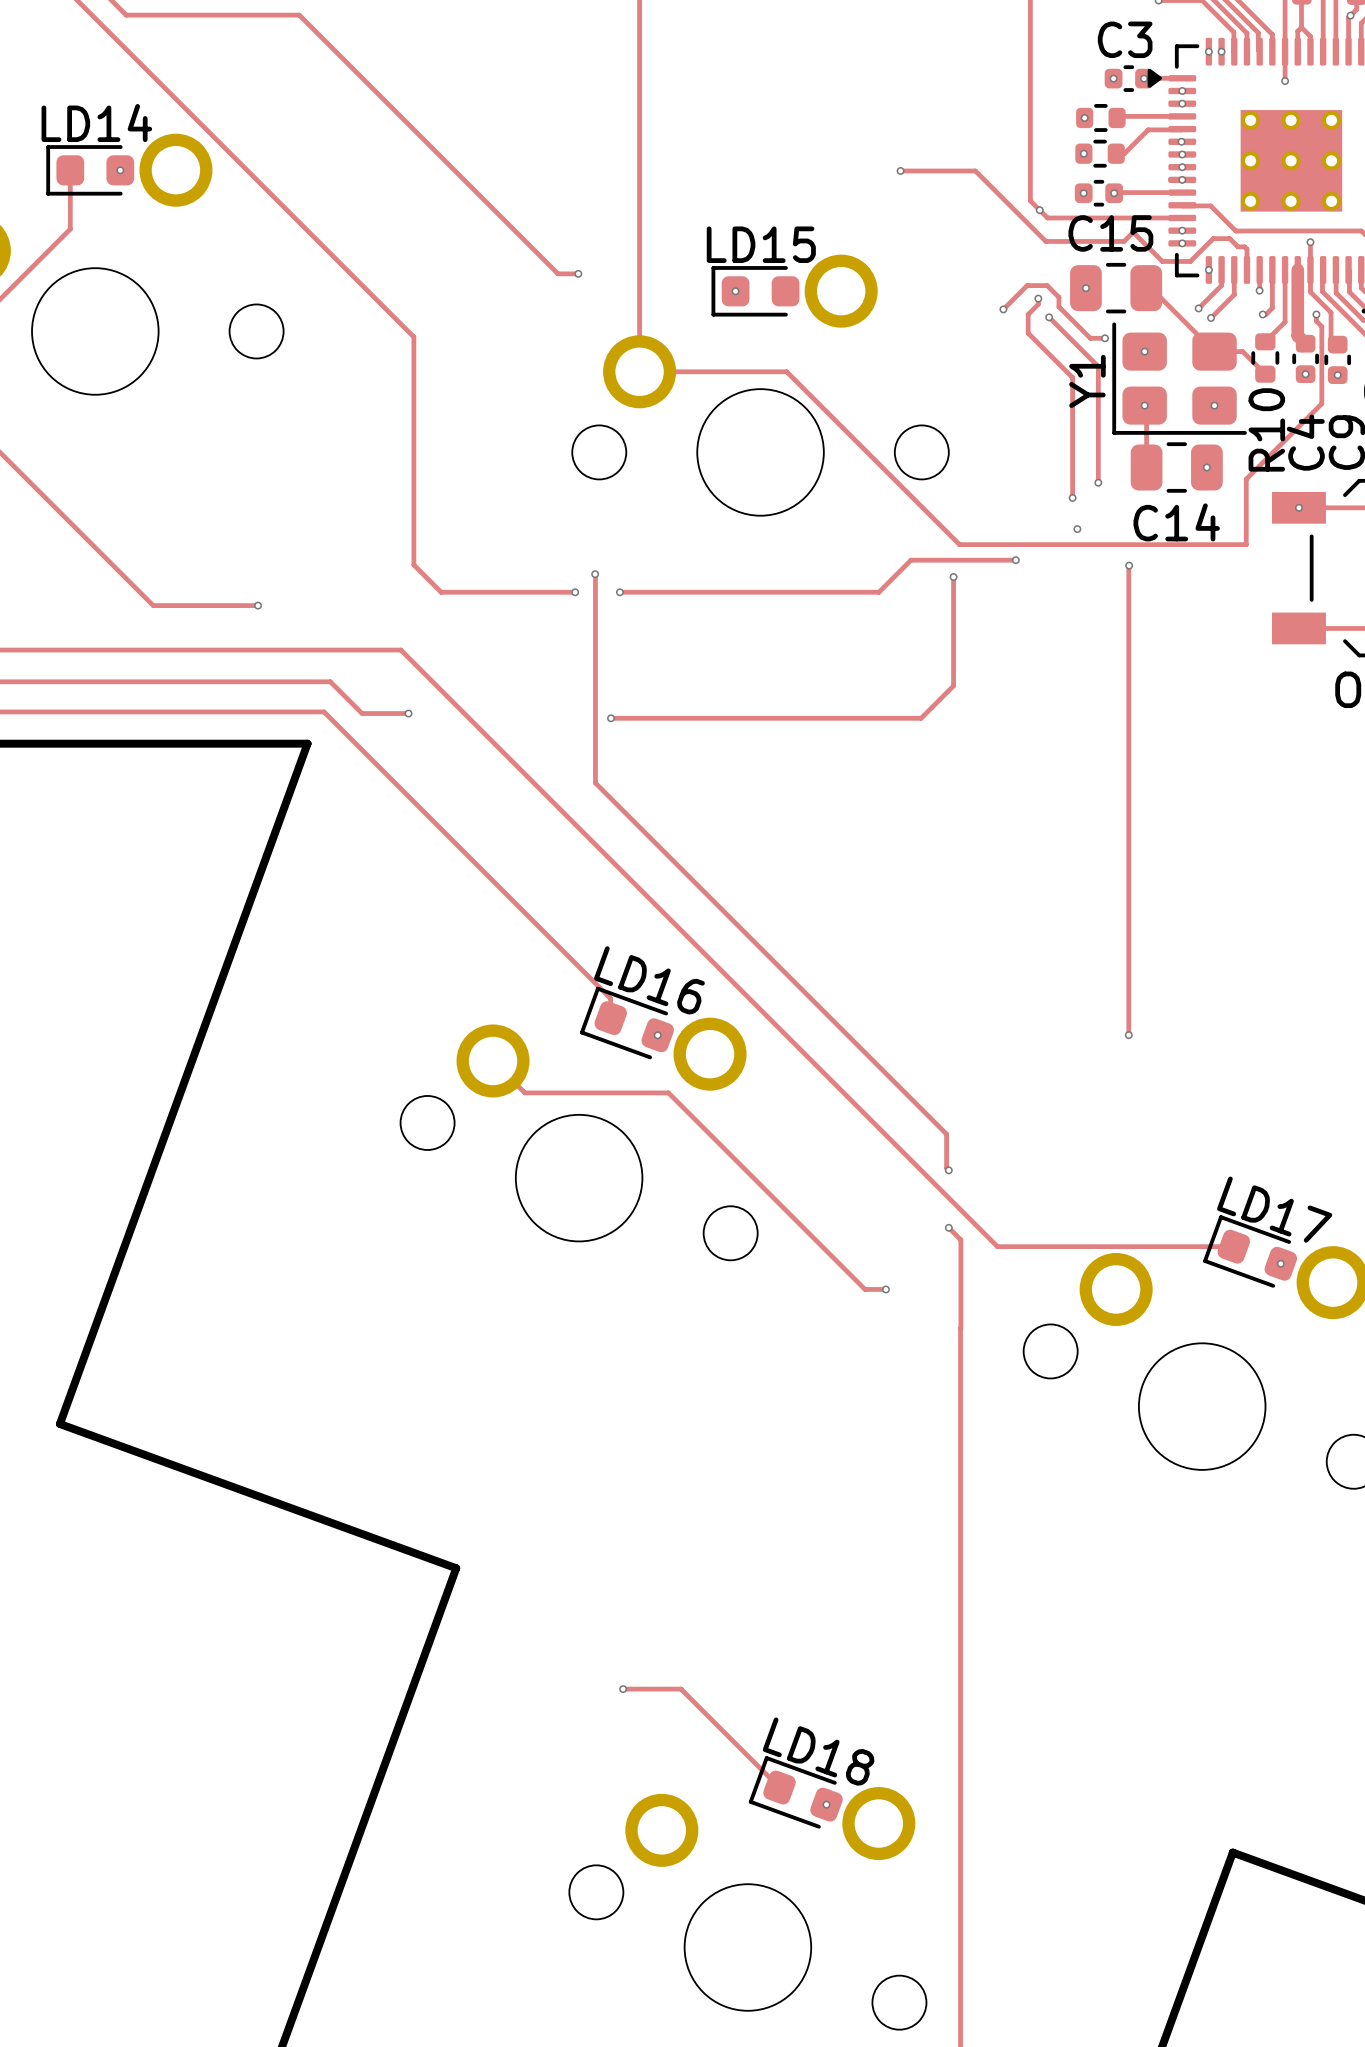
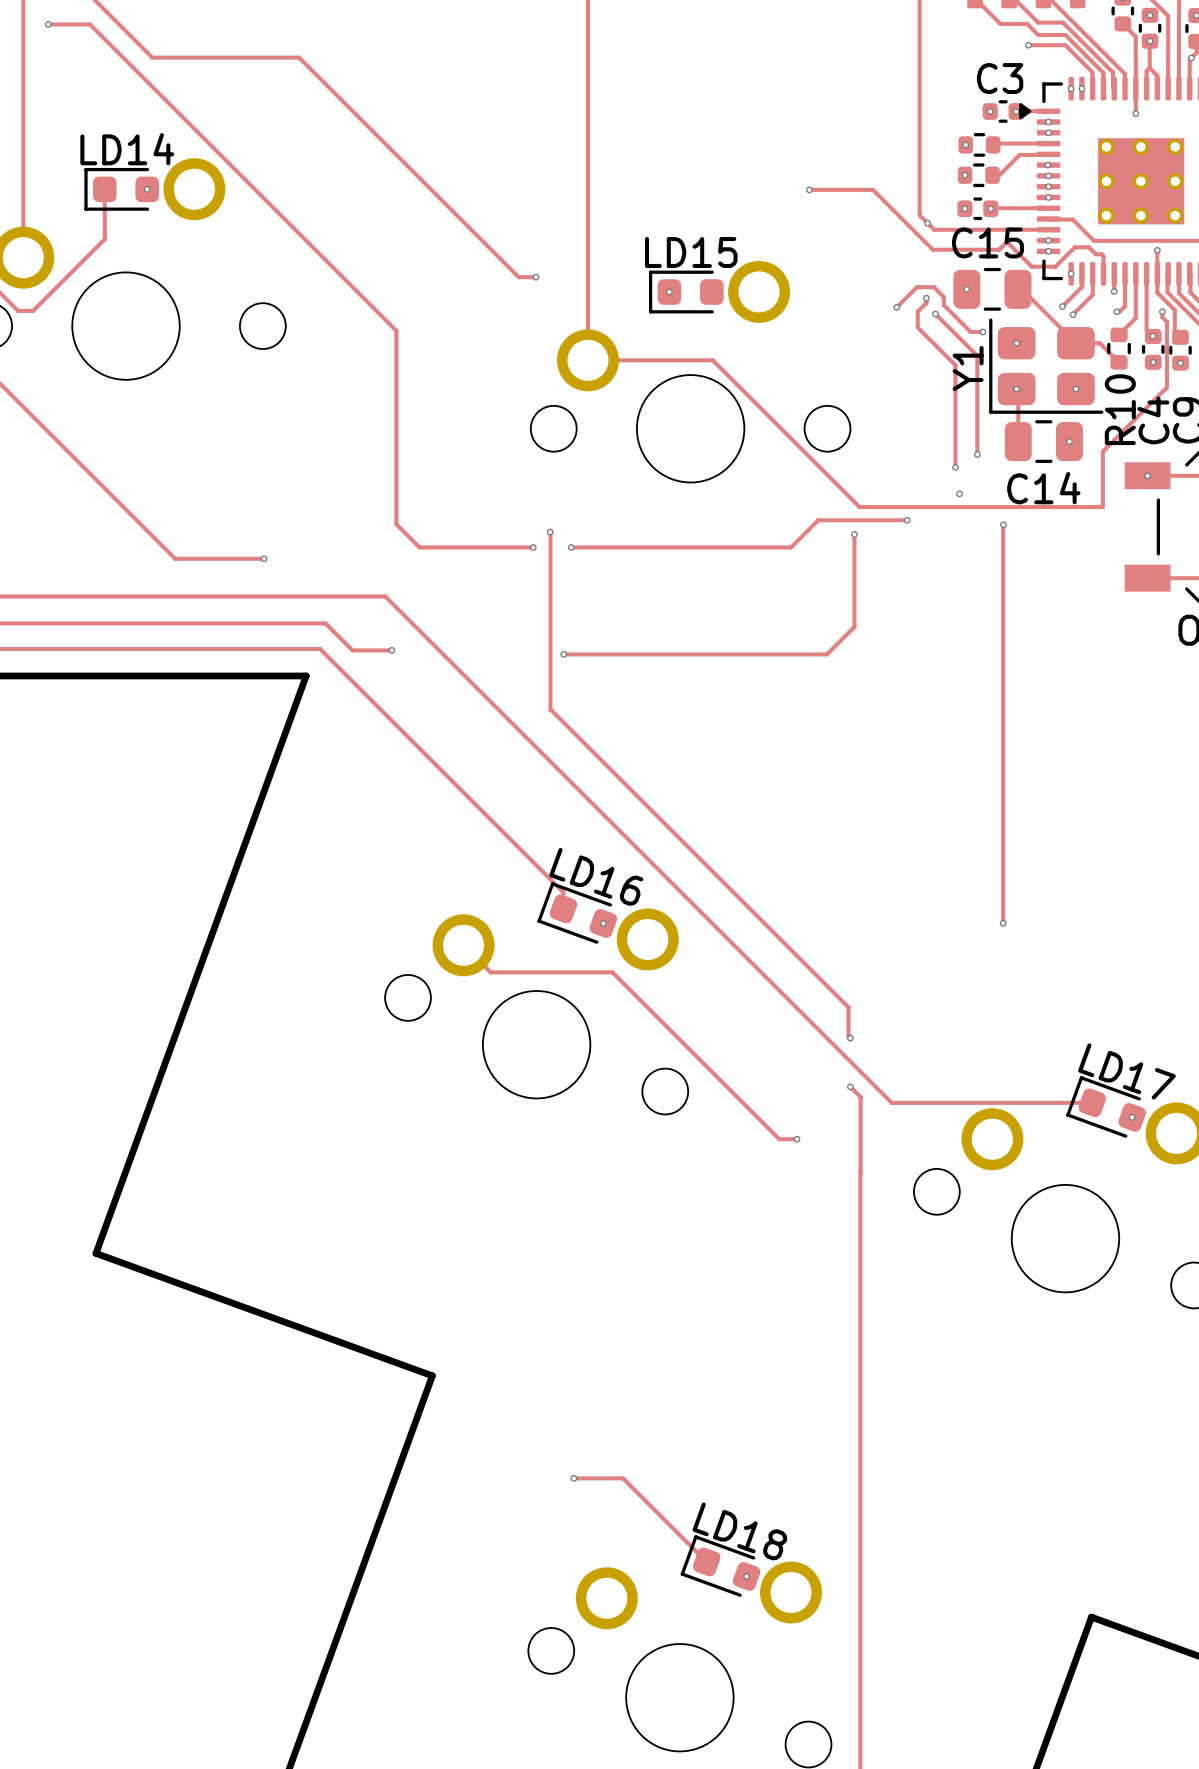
track width: thick (1297, 269) (1297, 335) (1305, 343) -> thin (1146, 273) (1146, 329) (1153, 336)
via: none -> (1152, 336)

